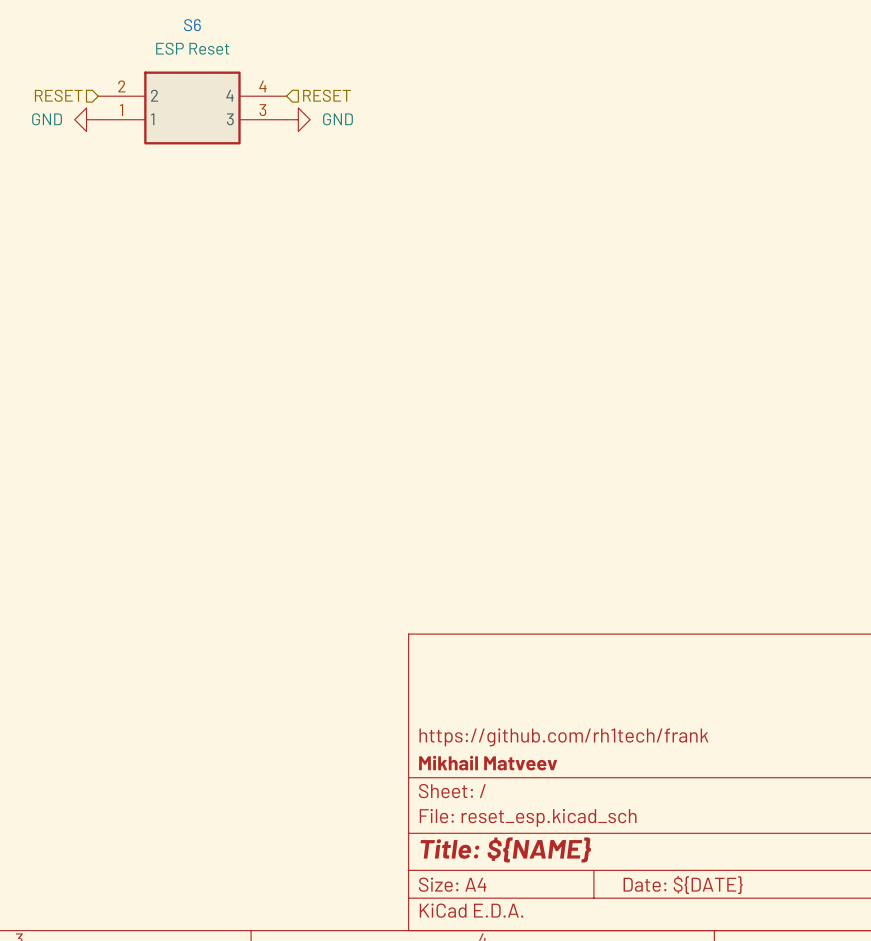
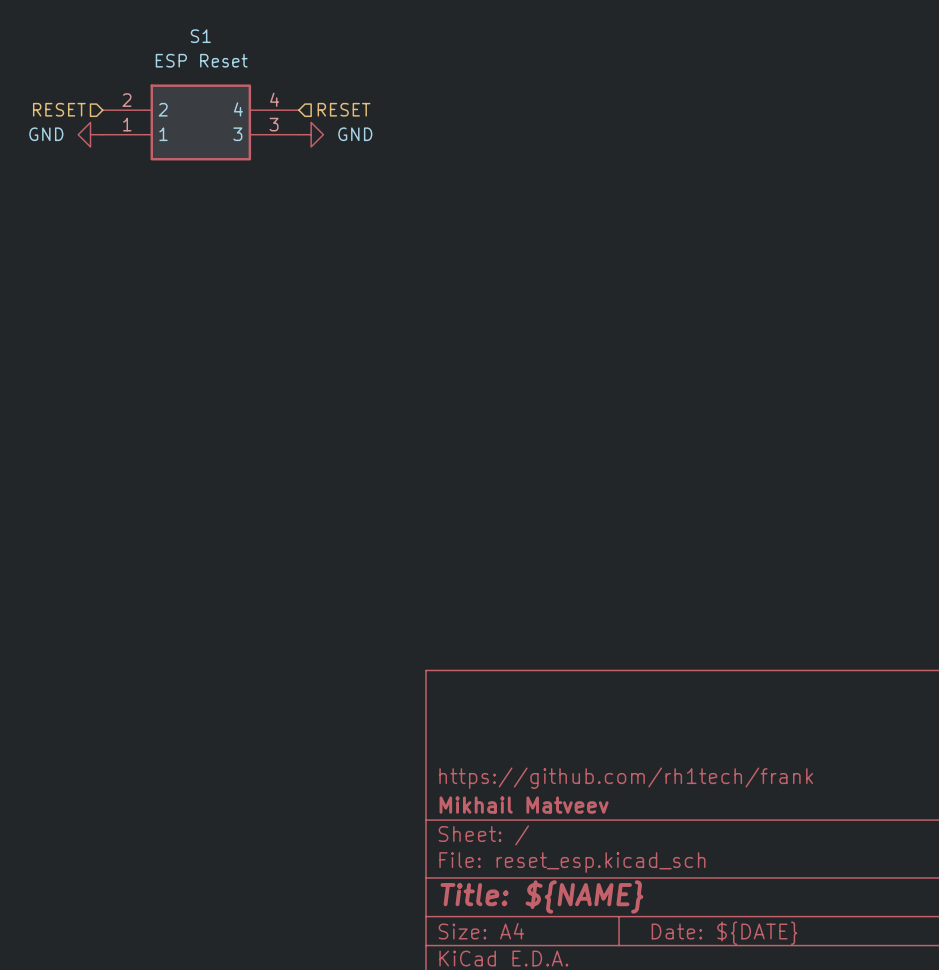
S6 name: S6 (192, 25) -> S1 (200, 36)

